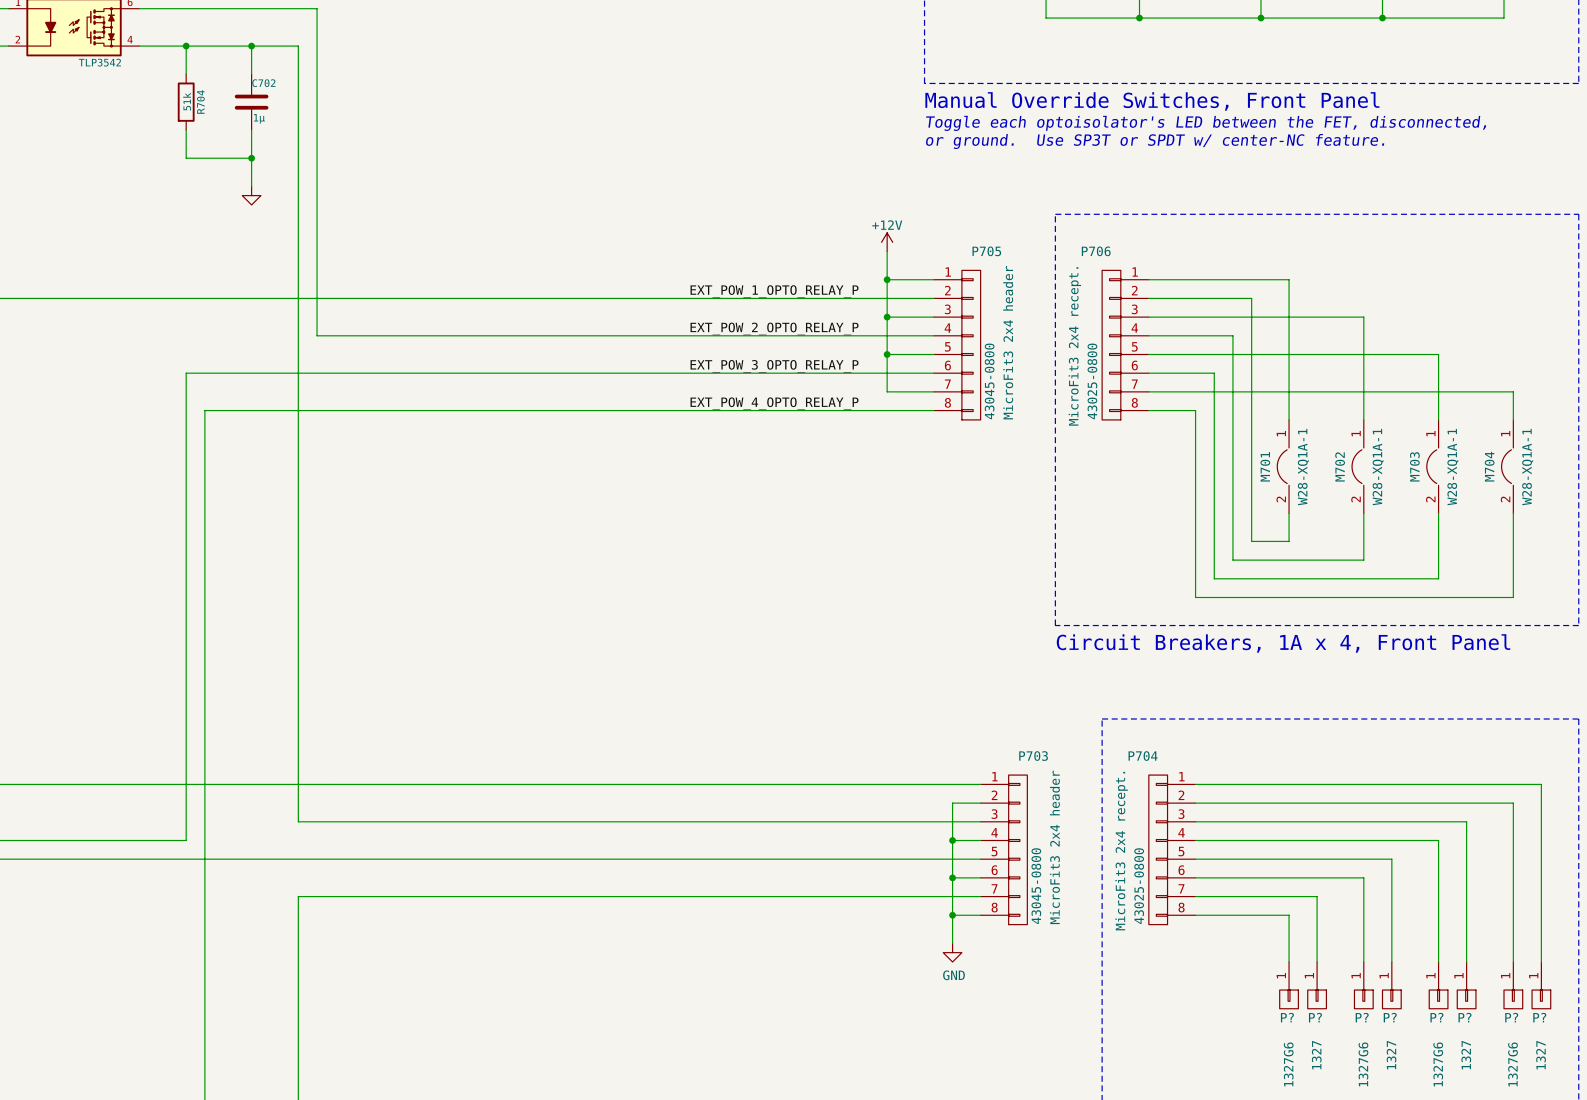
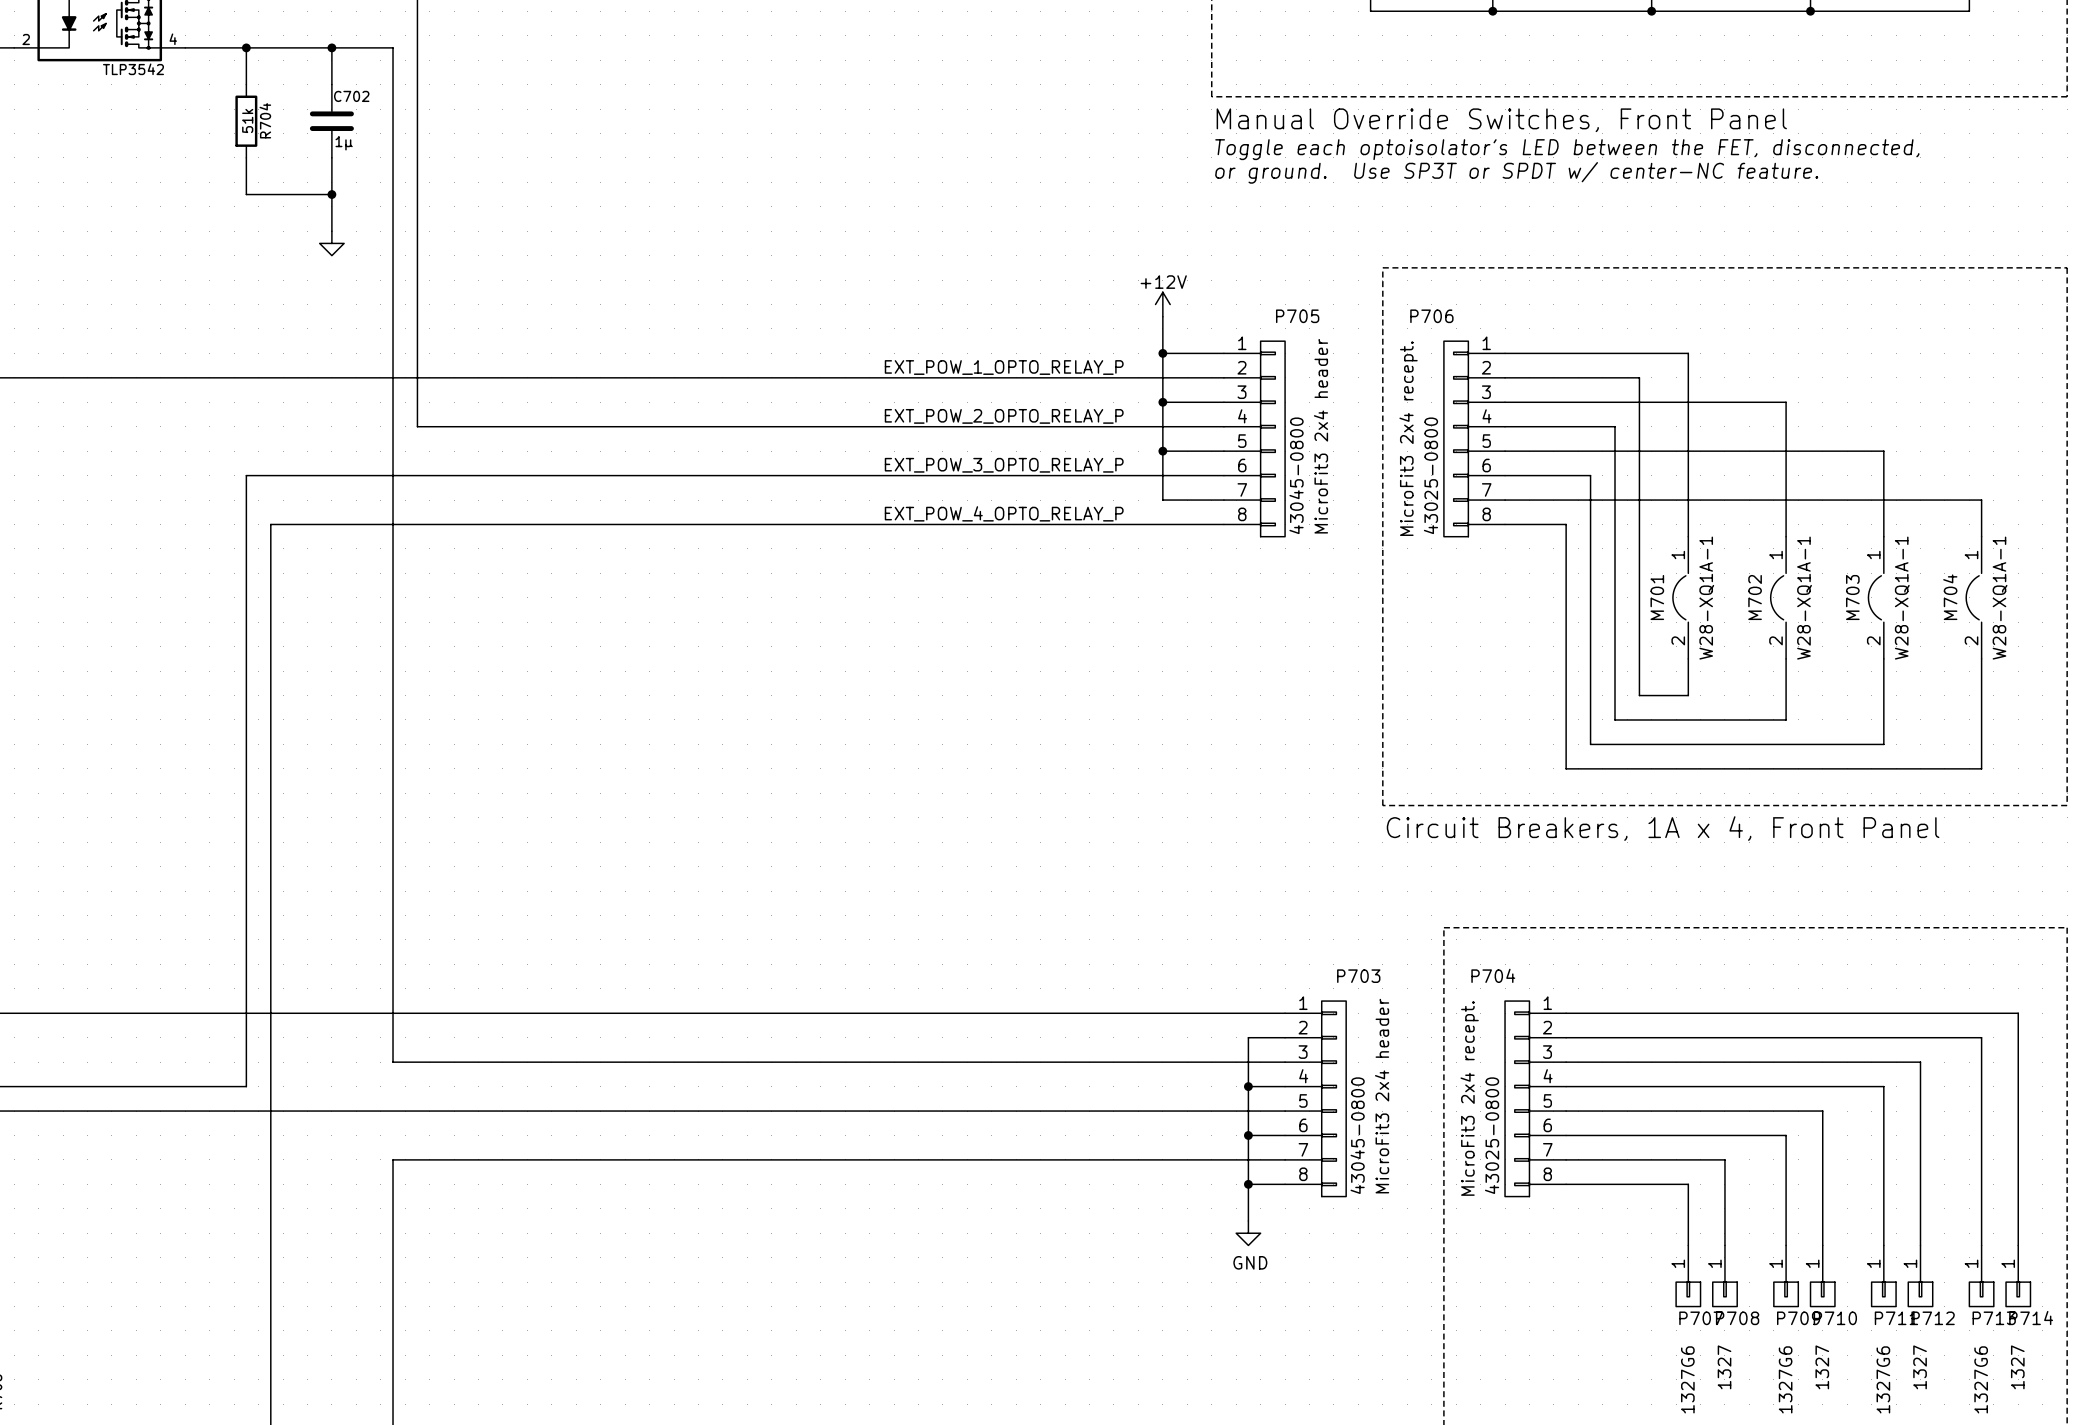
P? name: P? (1287, 1017) -> P707 (1701, 1318)
P? name: P? (1315, 1017) -> P708 (1737, 1318)
P? name: P? (1362, 1017) -> P709 (1798, 1318)
P? name: P? (1390, 1017) -> P710 (1835, 1318)
P? name: P? (1436, 1017) -> P711 (1896, 1318)
P? name: P? (1465, 1017) -> P712 (1933, 1318)
P? name: P? (1511, 1017) -> P713 (1994, 1318)
P? name: P? (1539, 1017) -> P714 (2031, 1318)

